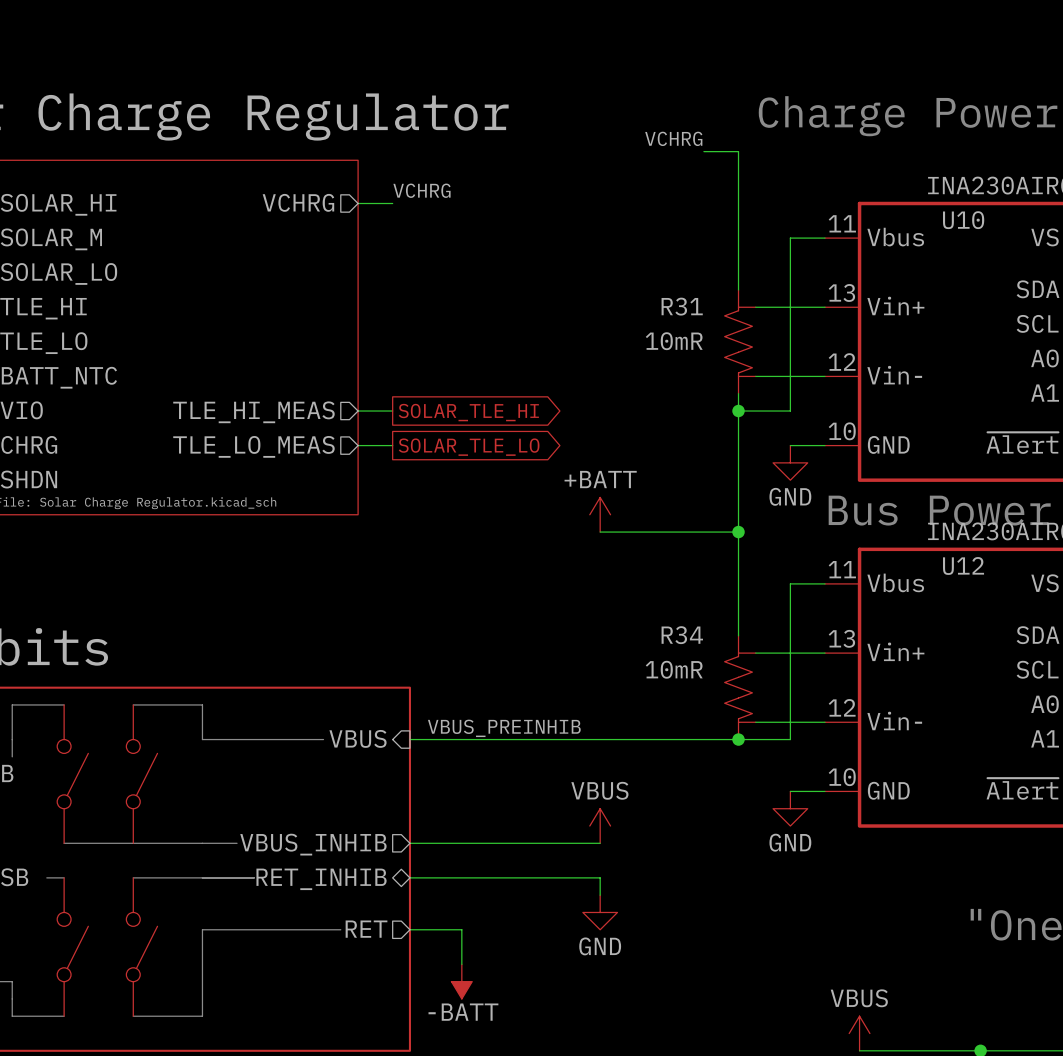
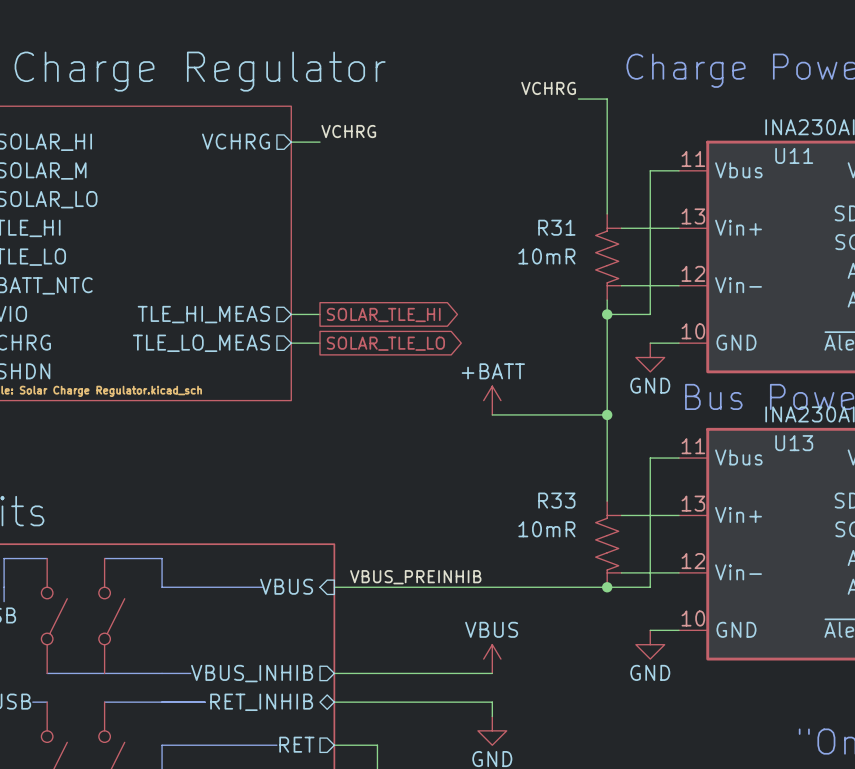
U10 name: U10 (963, 220) -> U11 (794, 155)
U12 name: U12 (963, 565) -> U13 (794, 443)
R34 name: R34 (682, 635) -> R33 (556, 500)

